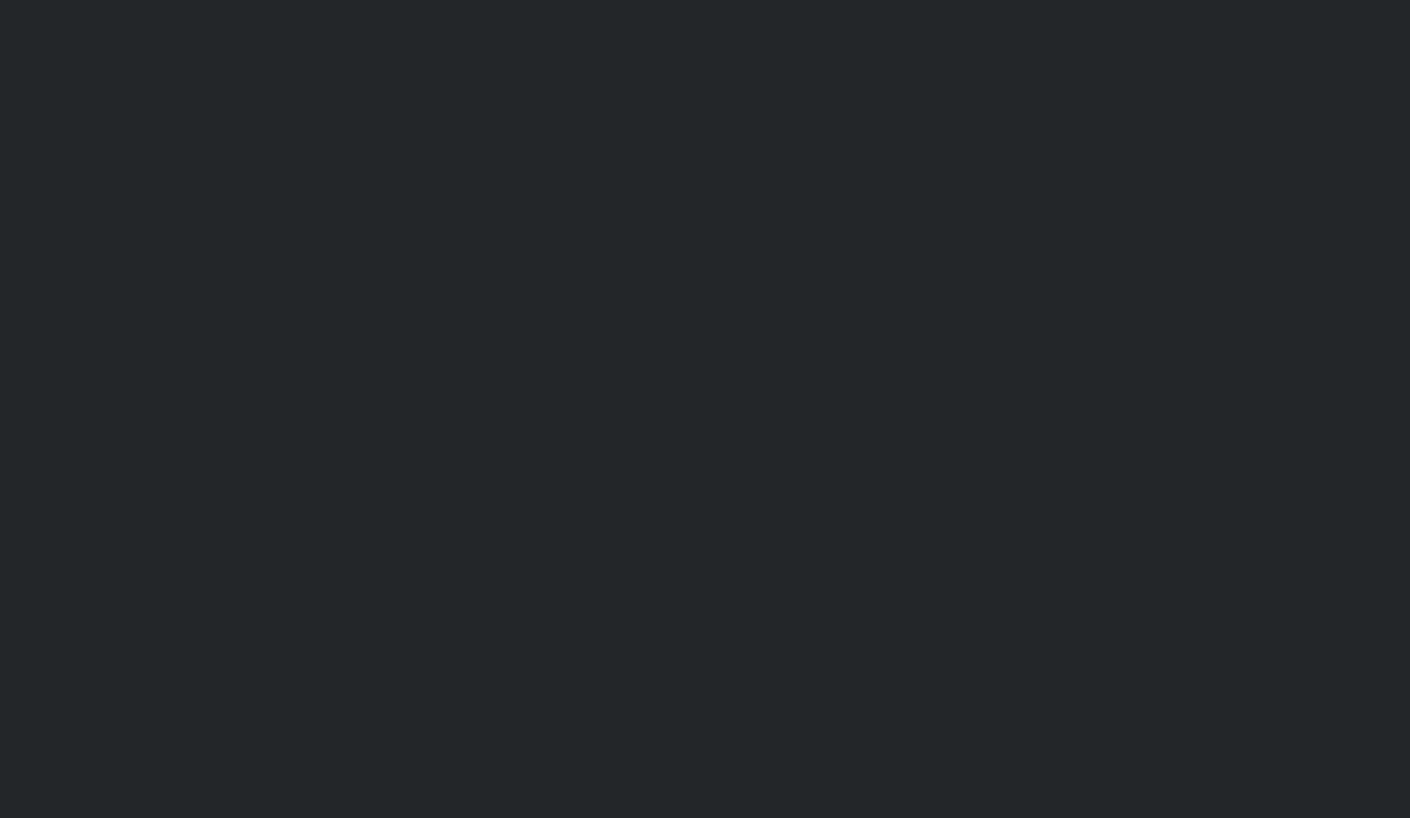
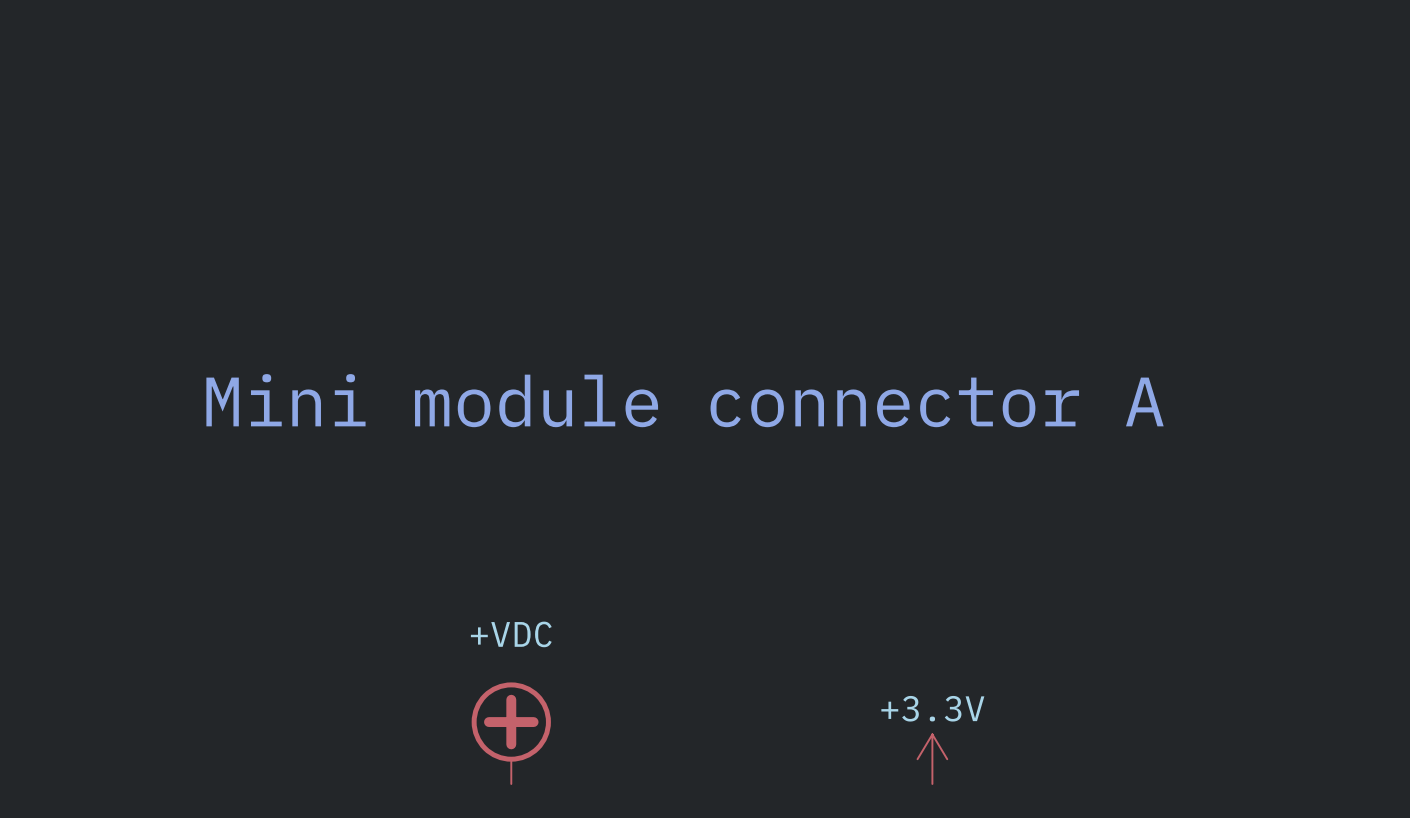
text: none -> Mini module connector A (685, 400)
power symbol: none -> +VDC (511, 733)
power symbol: none -> +3.3V (932, 759)

